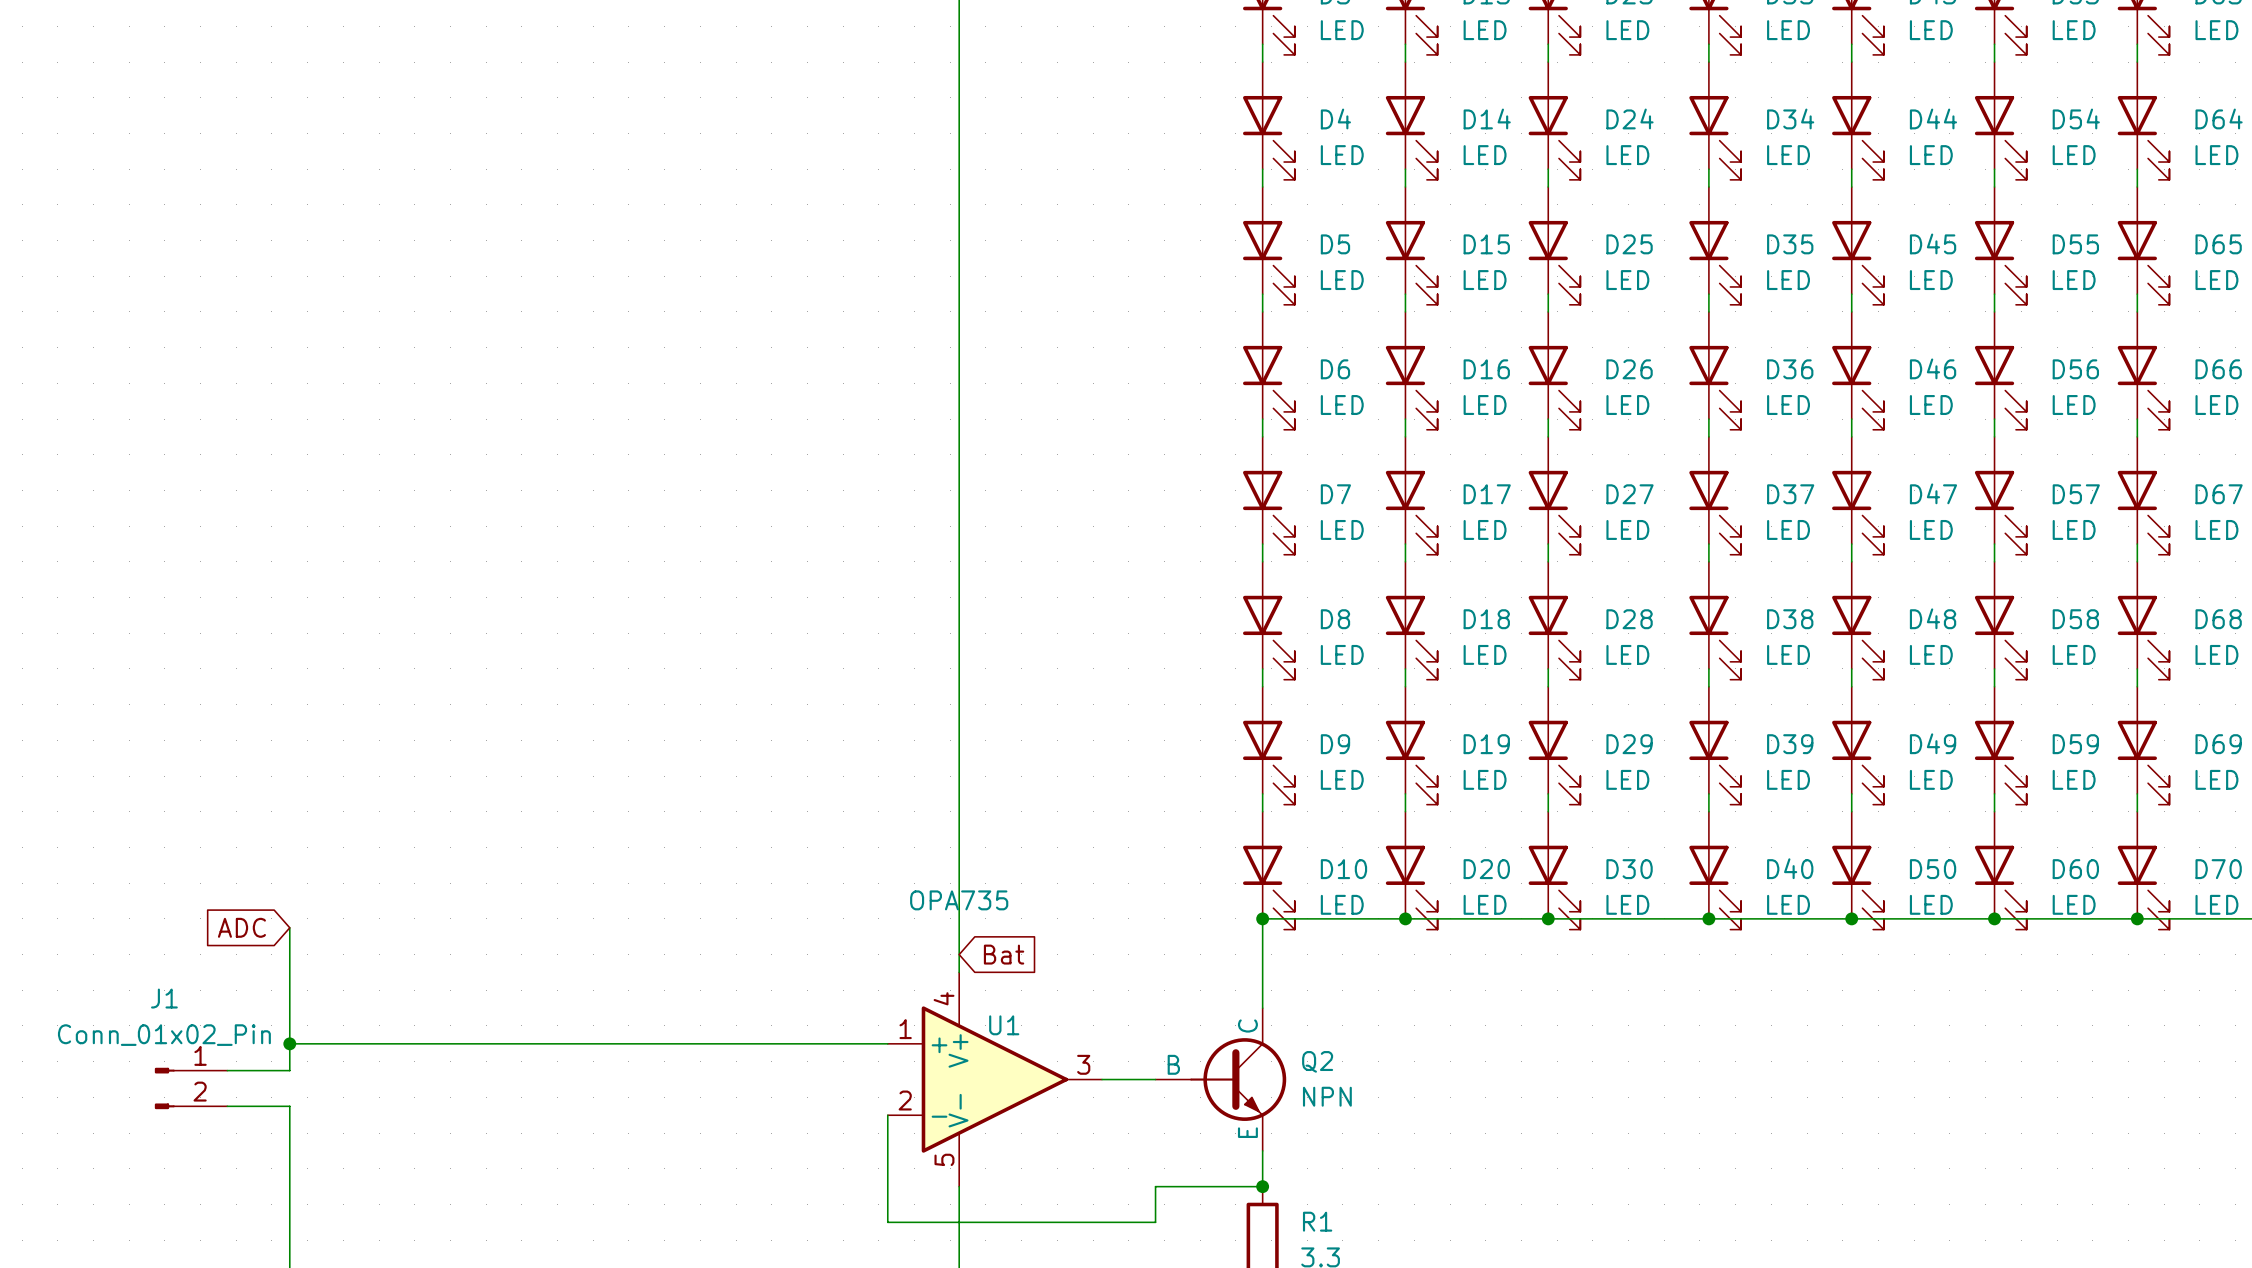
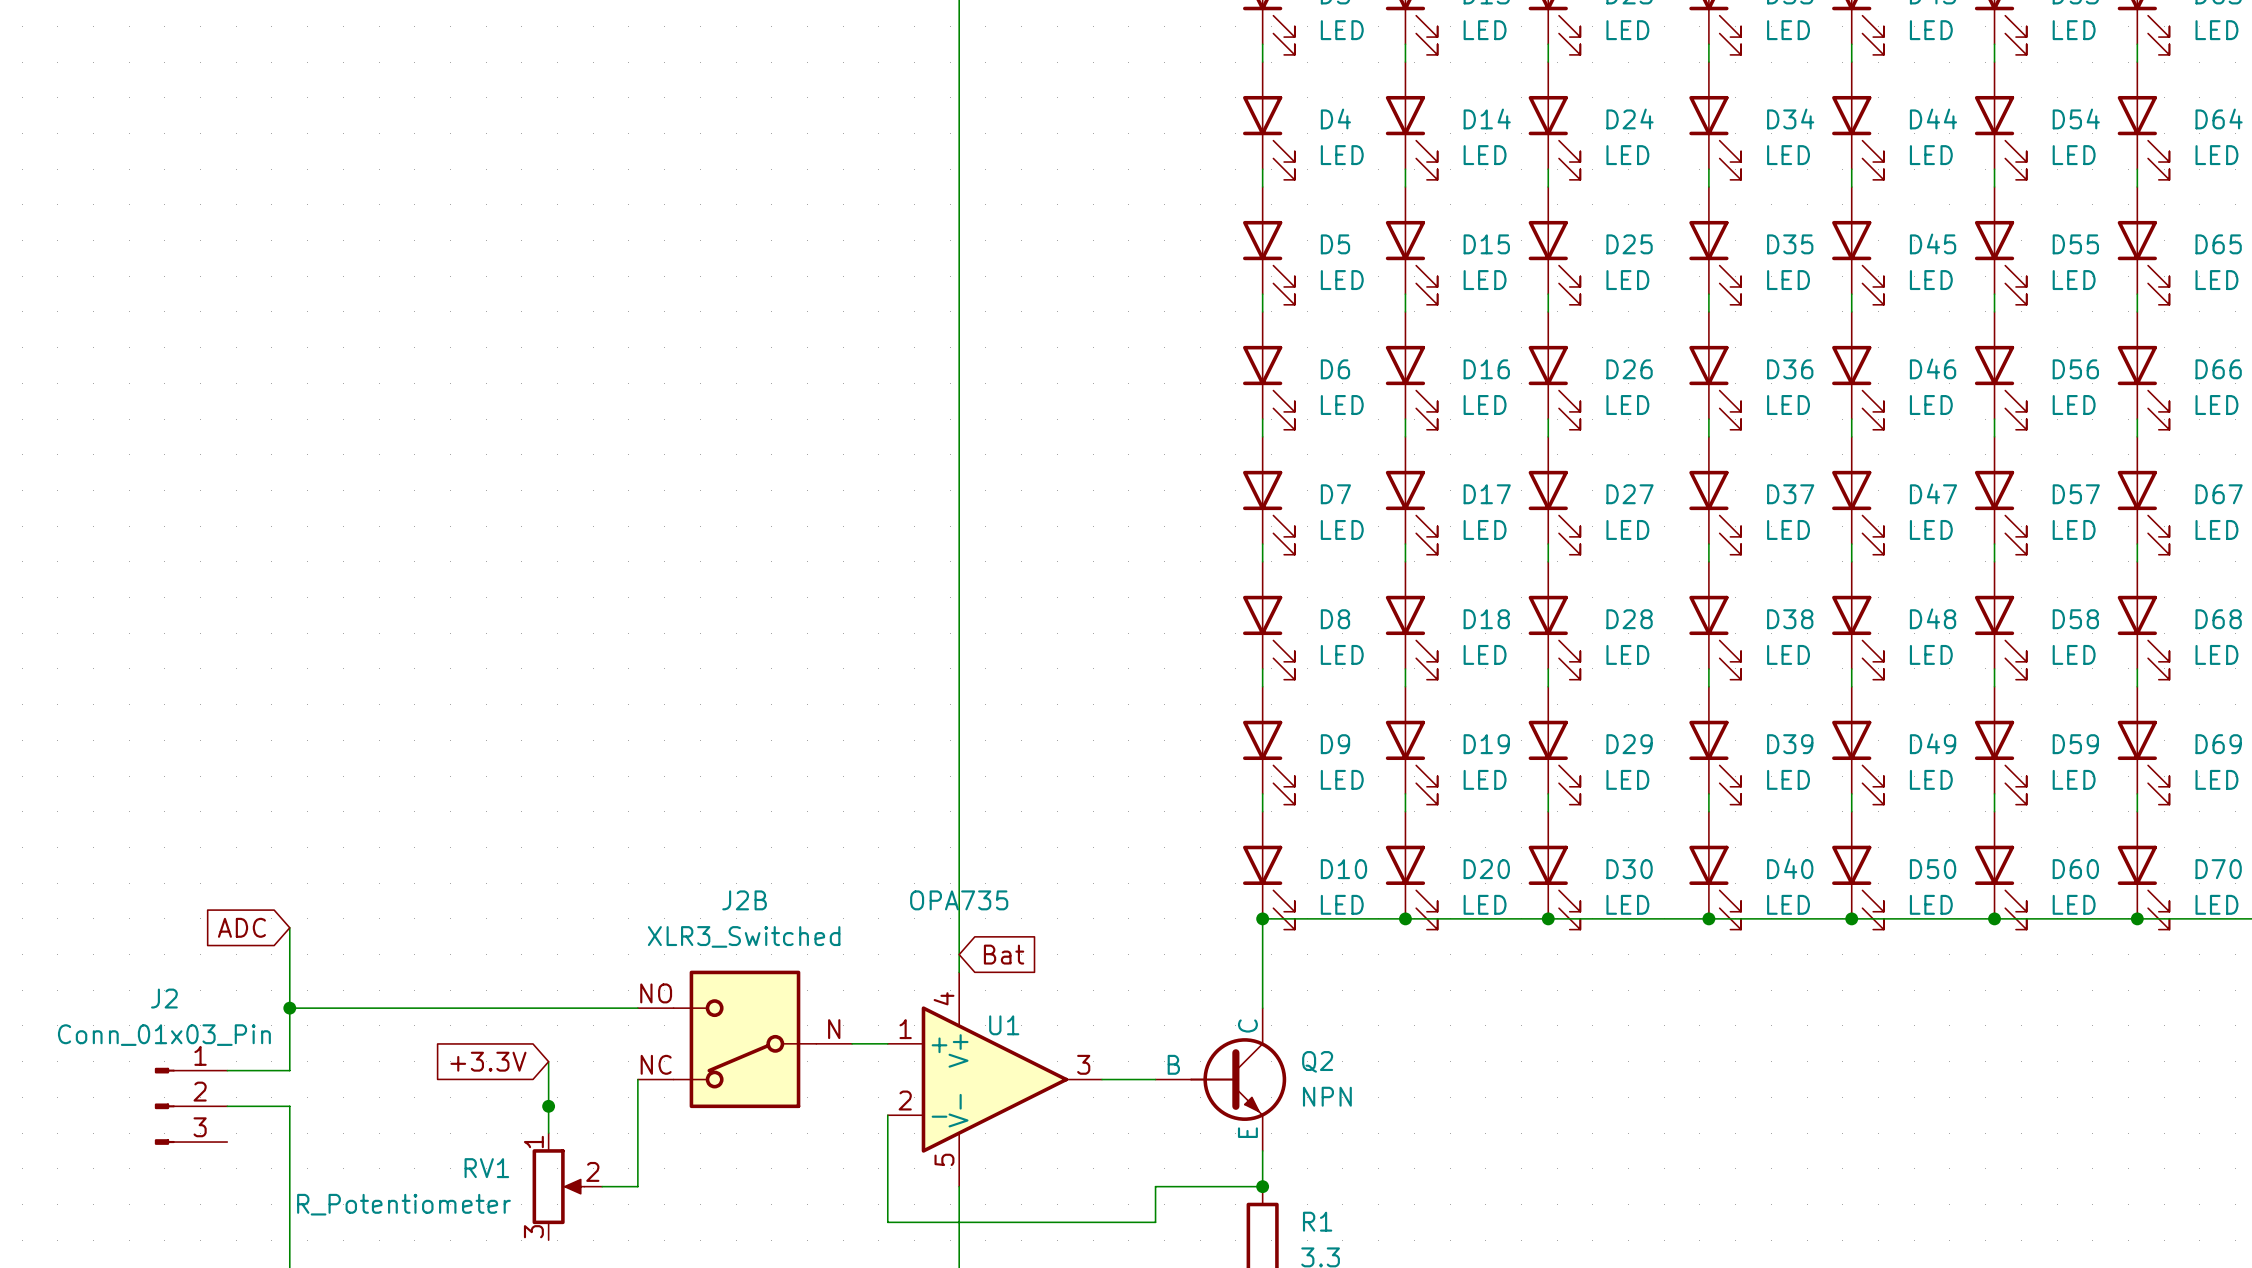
wire: none -> (289, 1008) (637, 1008)
J2B: none -> XLR3_Switched (744, 1039)
wire: (289, 1043) (852, 1043) -> none
junction position: (289, 1043) -> (289, 1008)
global label: none -> +3.3V (488, 1061)
wire: none -> (548, 1061) (548, 1133)
wire: none -> (637, 1079) (637, 1186) (602, 1186)
J1: Conn_01x02_Pin (191, 1088) -> none
J2: none -> Conn_01x03_Pin (191, 1106)
junction: none -> (548, 1106)
RV1: none -> R_Potentiometer (567, 1186)

